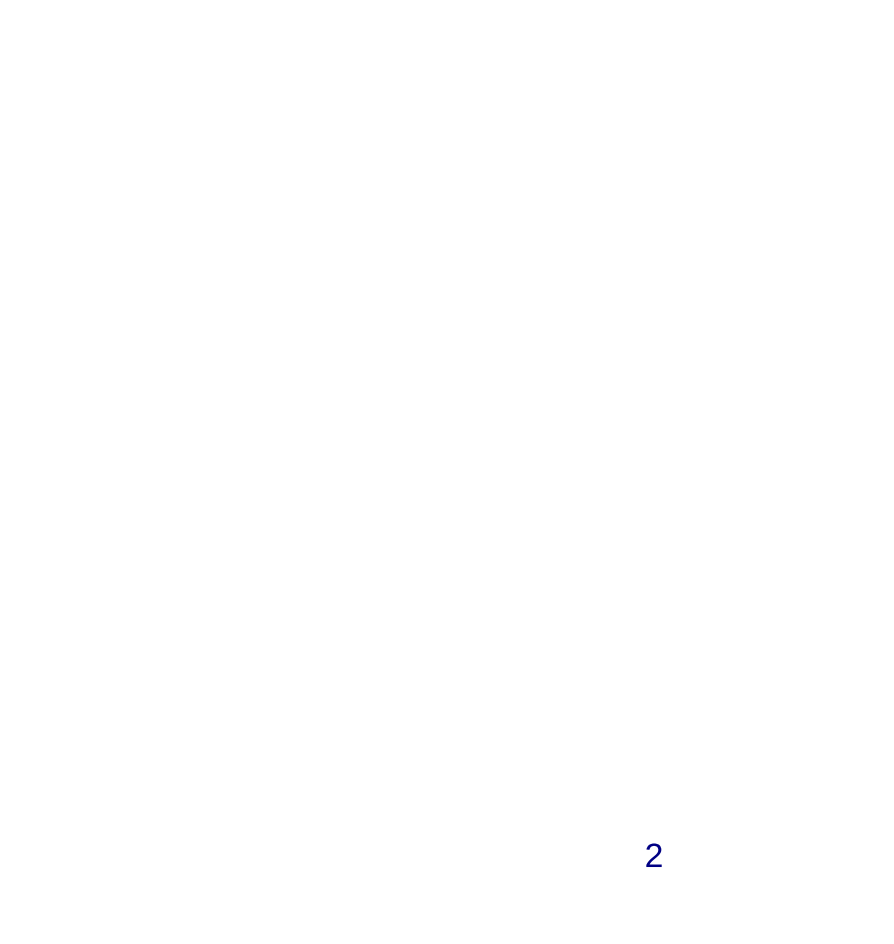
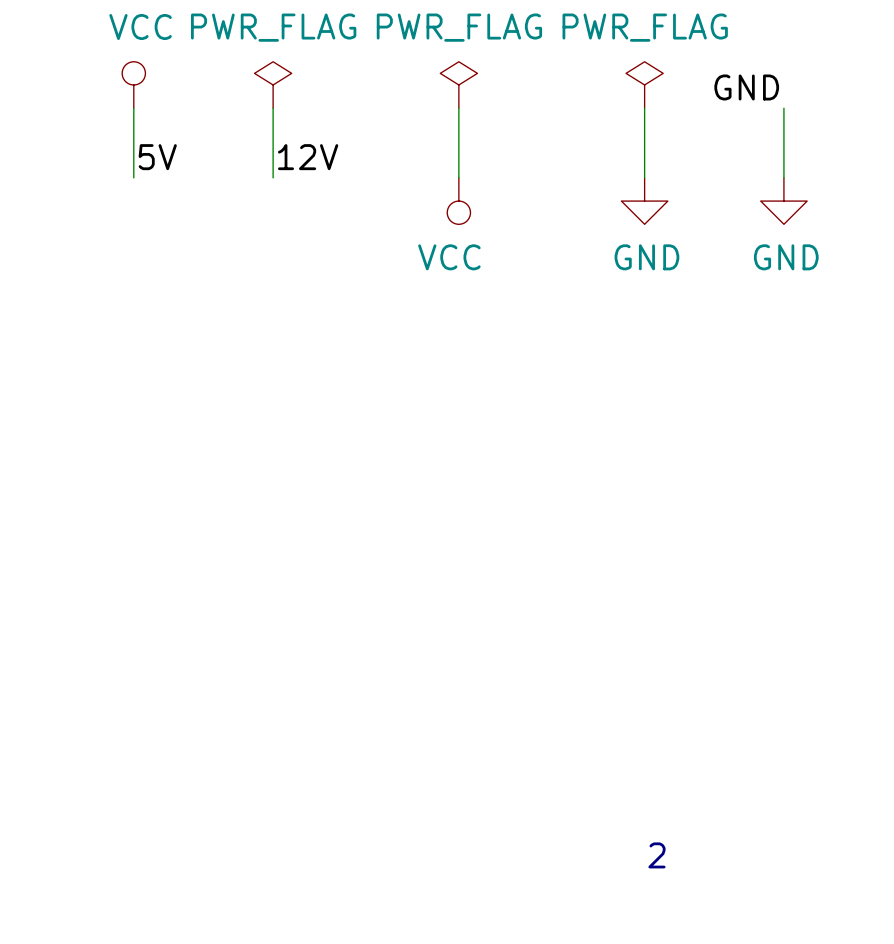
power symbol: none -> VCC (133, 84)
power symbol: none -> PWR_FLAG (273, 84)
power symbol: none -> PWR_FLAG (458, 84)
power symbol: none -> PWR_FLAG (644, 84)
label: none -> GND (746, 87)
wire: none -> (133, 108) (133, 177)
wire: none -> (273, 108) (273, 177)
wire: none -> (458, 108) (458, 177)
wire: none -> (644, 108) (644, 177)
wire: none -> (783, 108) (783, 177)
label: none -> 12V (308, 157)
label: none -> 5V (157, 157)
power symbol: none -> VCC (458, 201)
power symbol: none -> GND (644, 201)
power symbol: none -> GND (783, 201)

